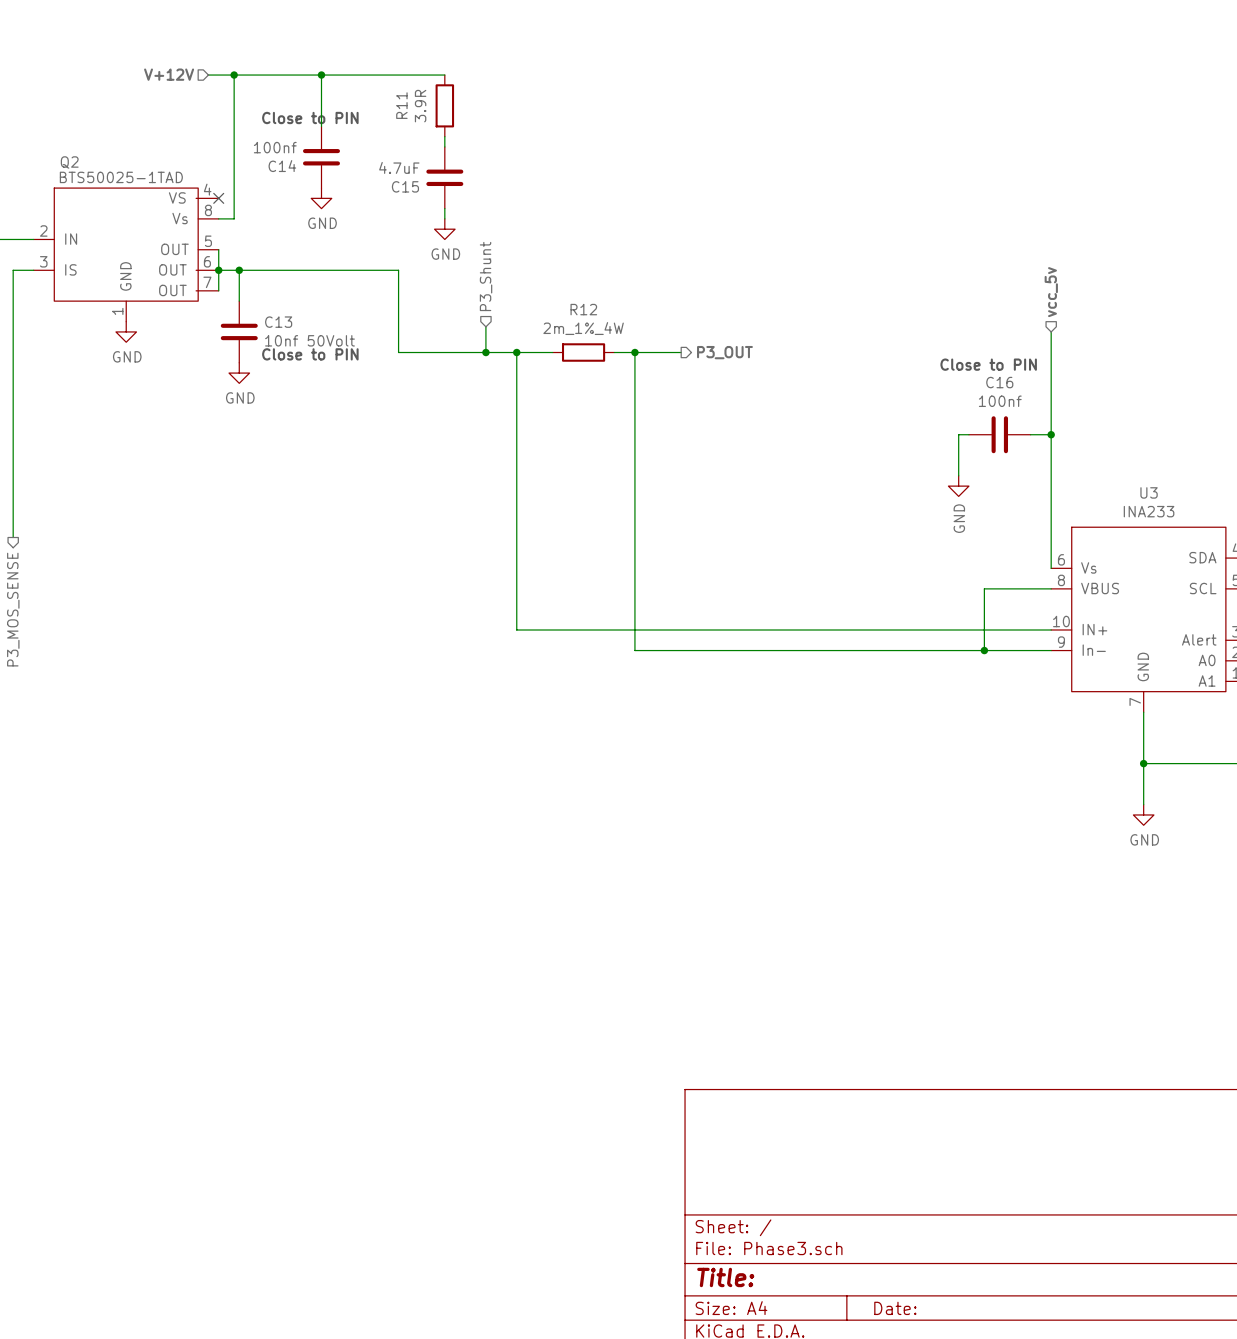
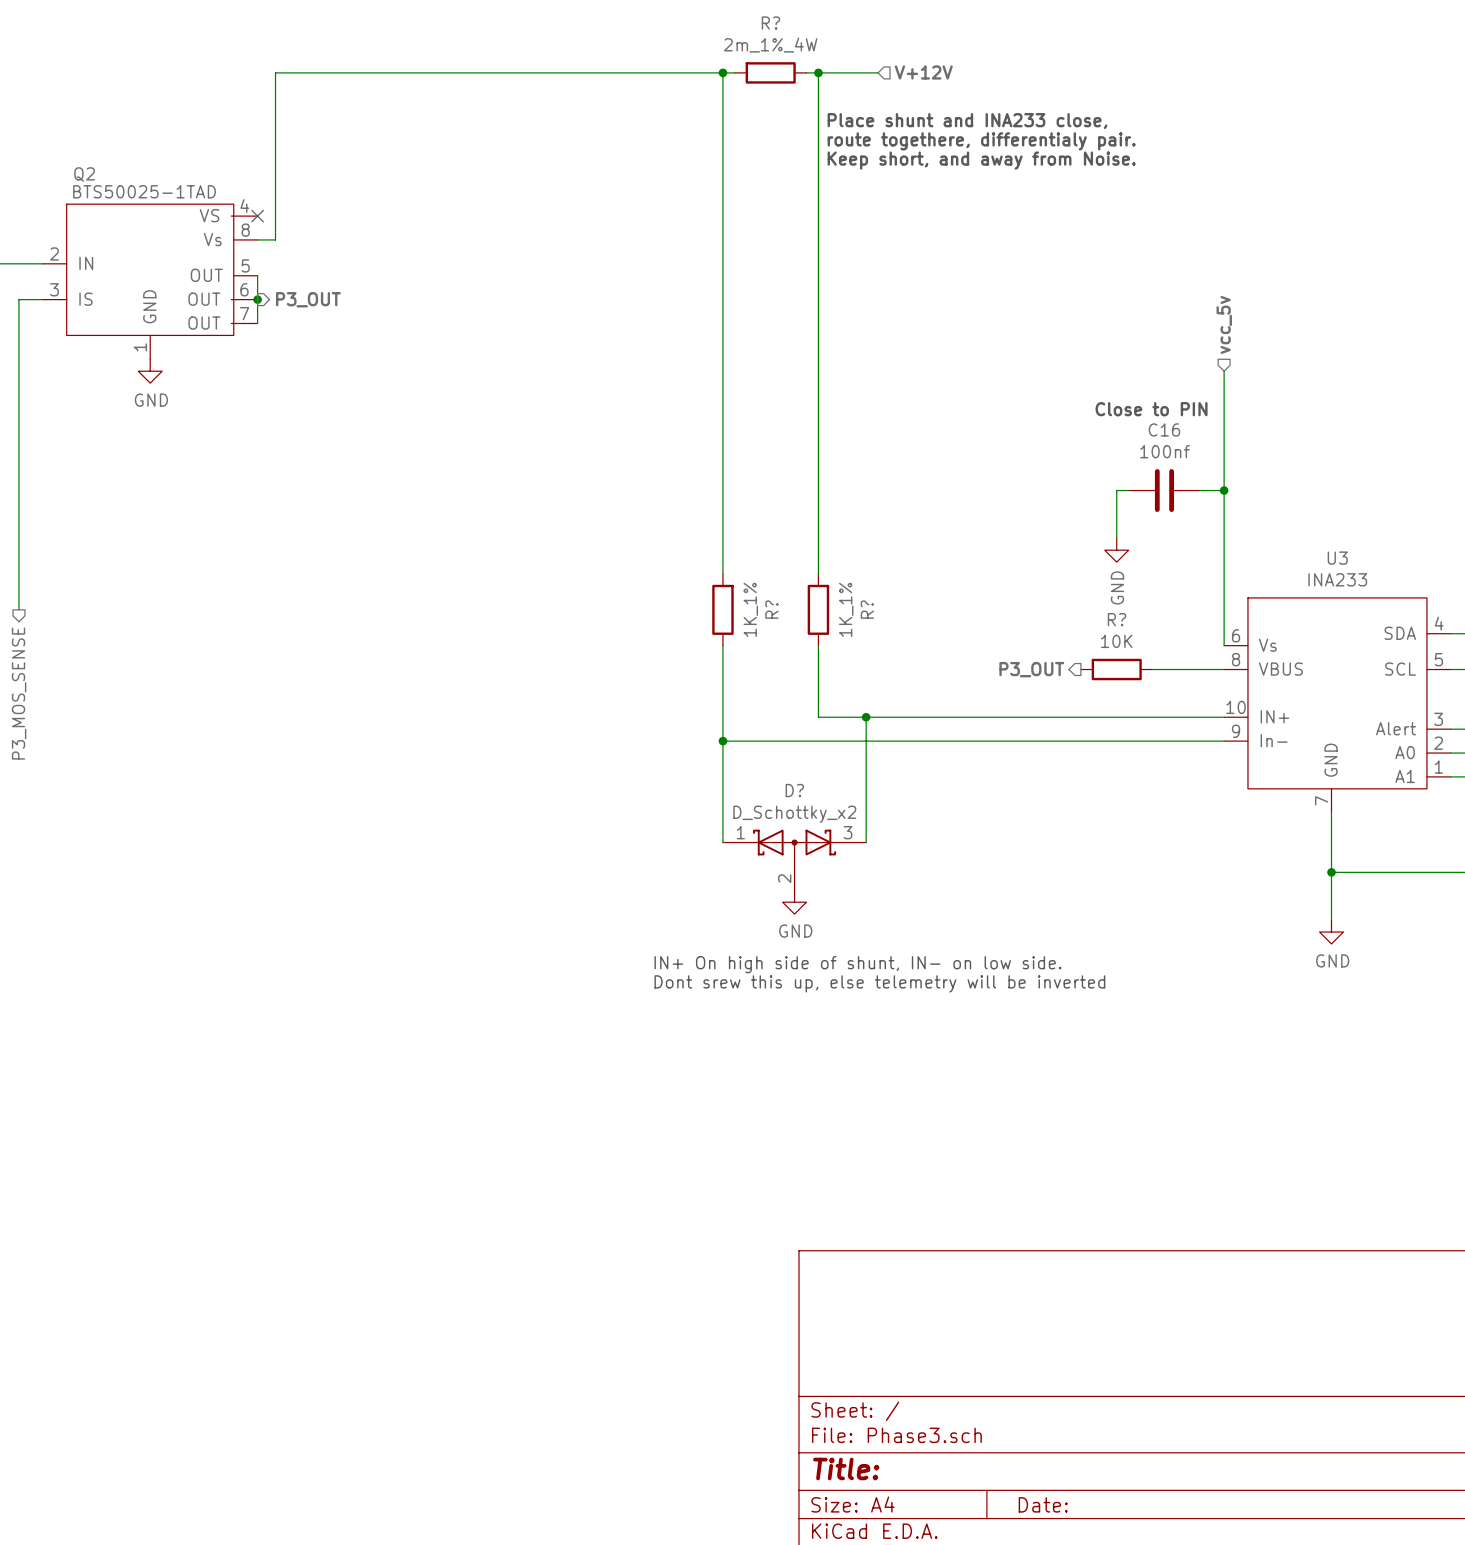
hierarchical label: V+12V (169, 74) -> none
hierarchical label: none -> V+12V (923, 72)
wire: (208, 75) (234, 75) -> none
junction: (234, 75) -> none
wire: (321, 75) (321, 126) -> none
junction: (321, 75) -> none
wire: none -> (520, 72) (734, 72)
wire: none -> (722, 72) (722, 574)
junction: none -> (722, 72)
R?: none -> 2m_1%_4W (770, 72)
wire: none -> (806, 72) (878, 72)
wire: none -> (818, 72) (818, 574)
junction: none -> (818, 72)
R11: 3.9R (444, 105) -> none
text: none -> Place shunt and INA233 close, (967, 121)
text: Close to PIN (310, 117) -> none
text: none -> route togethere, differentialy pair. (981, 141)
wire: (444, 136) (444, 146) -> none
text: none -> Keep short, and away from Noise. (981, 160)
C14: 100nf (321, 157) -> none
C15: 4.7uF (444, 177) -> none
power symbol: GND (321, 198) -> none
wire: (444, 208) (444, 218) -> none
power symbol: GND (444, 229) -> none
wire: (218, 270) (398, 270) (398, 352) (552, 352) -> none
wire: (239, 270) (239, 301) -> none
junction: (239, 270) -> none
hierarchical label: none -> P3_OUT (308, 299)
hierarchical label: P3_Shunt (486, 276) -> none
wire: (485, 326) (485, 352) -> none
C13: 10nf 50Volt (239, 331) -> none
junction: (485, 352) -> none
wire: (516, 352) (516, 629) (701, 629) -> (818, 645) (818, 717)
junction: (516, 352) -> none
R12: 2m_1%_4W (583, 352) -> none
wire: (614, 352) (681, 352) -> none
wire: (634, 352) (634, 650) -> (722, 741) (740, 741)
junction: (634, 352) -> none
hierarchical label: P3_OUT (724, 352) -> none
text: Close to PIN (310, 354) -> none
power symbol: GND (239, 373) -> none
R?: none -> 1K_1% (722, 609)
R?: none -> 1K_1% (818, 609)
wire: none -> (722, 645) (722, 842)
hierarchical label: none -> P3_OUT (1031, 669)
R?: none -> 10K (1116, 669)
wire: (989, 588) (984, 588) (984, 650) -> none
wire: none -> (866, 717) (866, 842)
junction: none -> (866, 717)
junction: none -> (722, 741)
junction: (984, 650) -> none
D?: none -> D_Schottky_x2 (794, 859)
power symbol: none -> GND (794, 902)
text: none -> IN+ On high side of shunt, IN- on low side. (858, 964)
text: none -> Dont srew this up, else telemetry will be inverted (879, 983)

